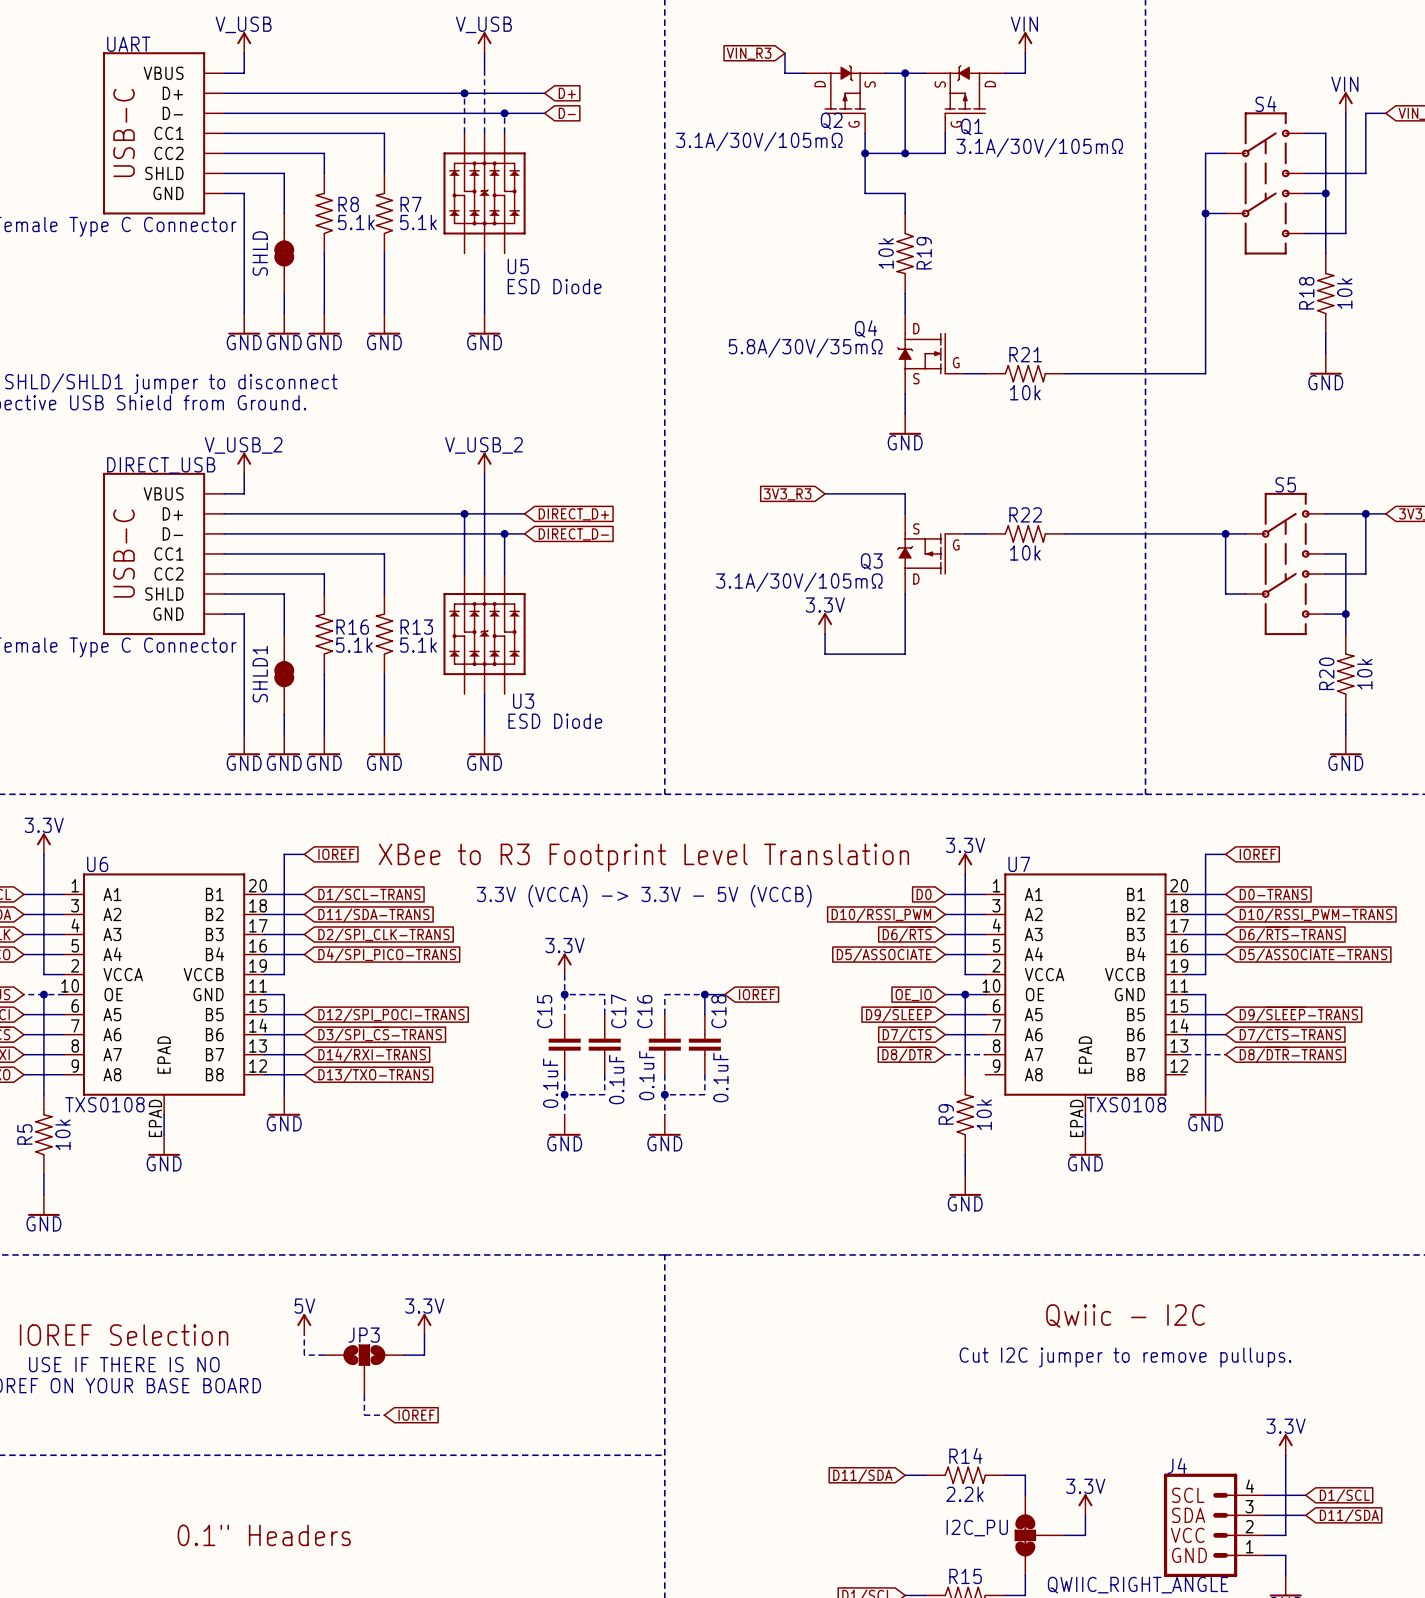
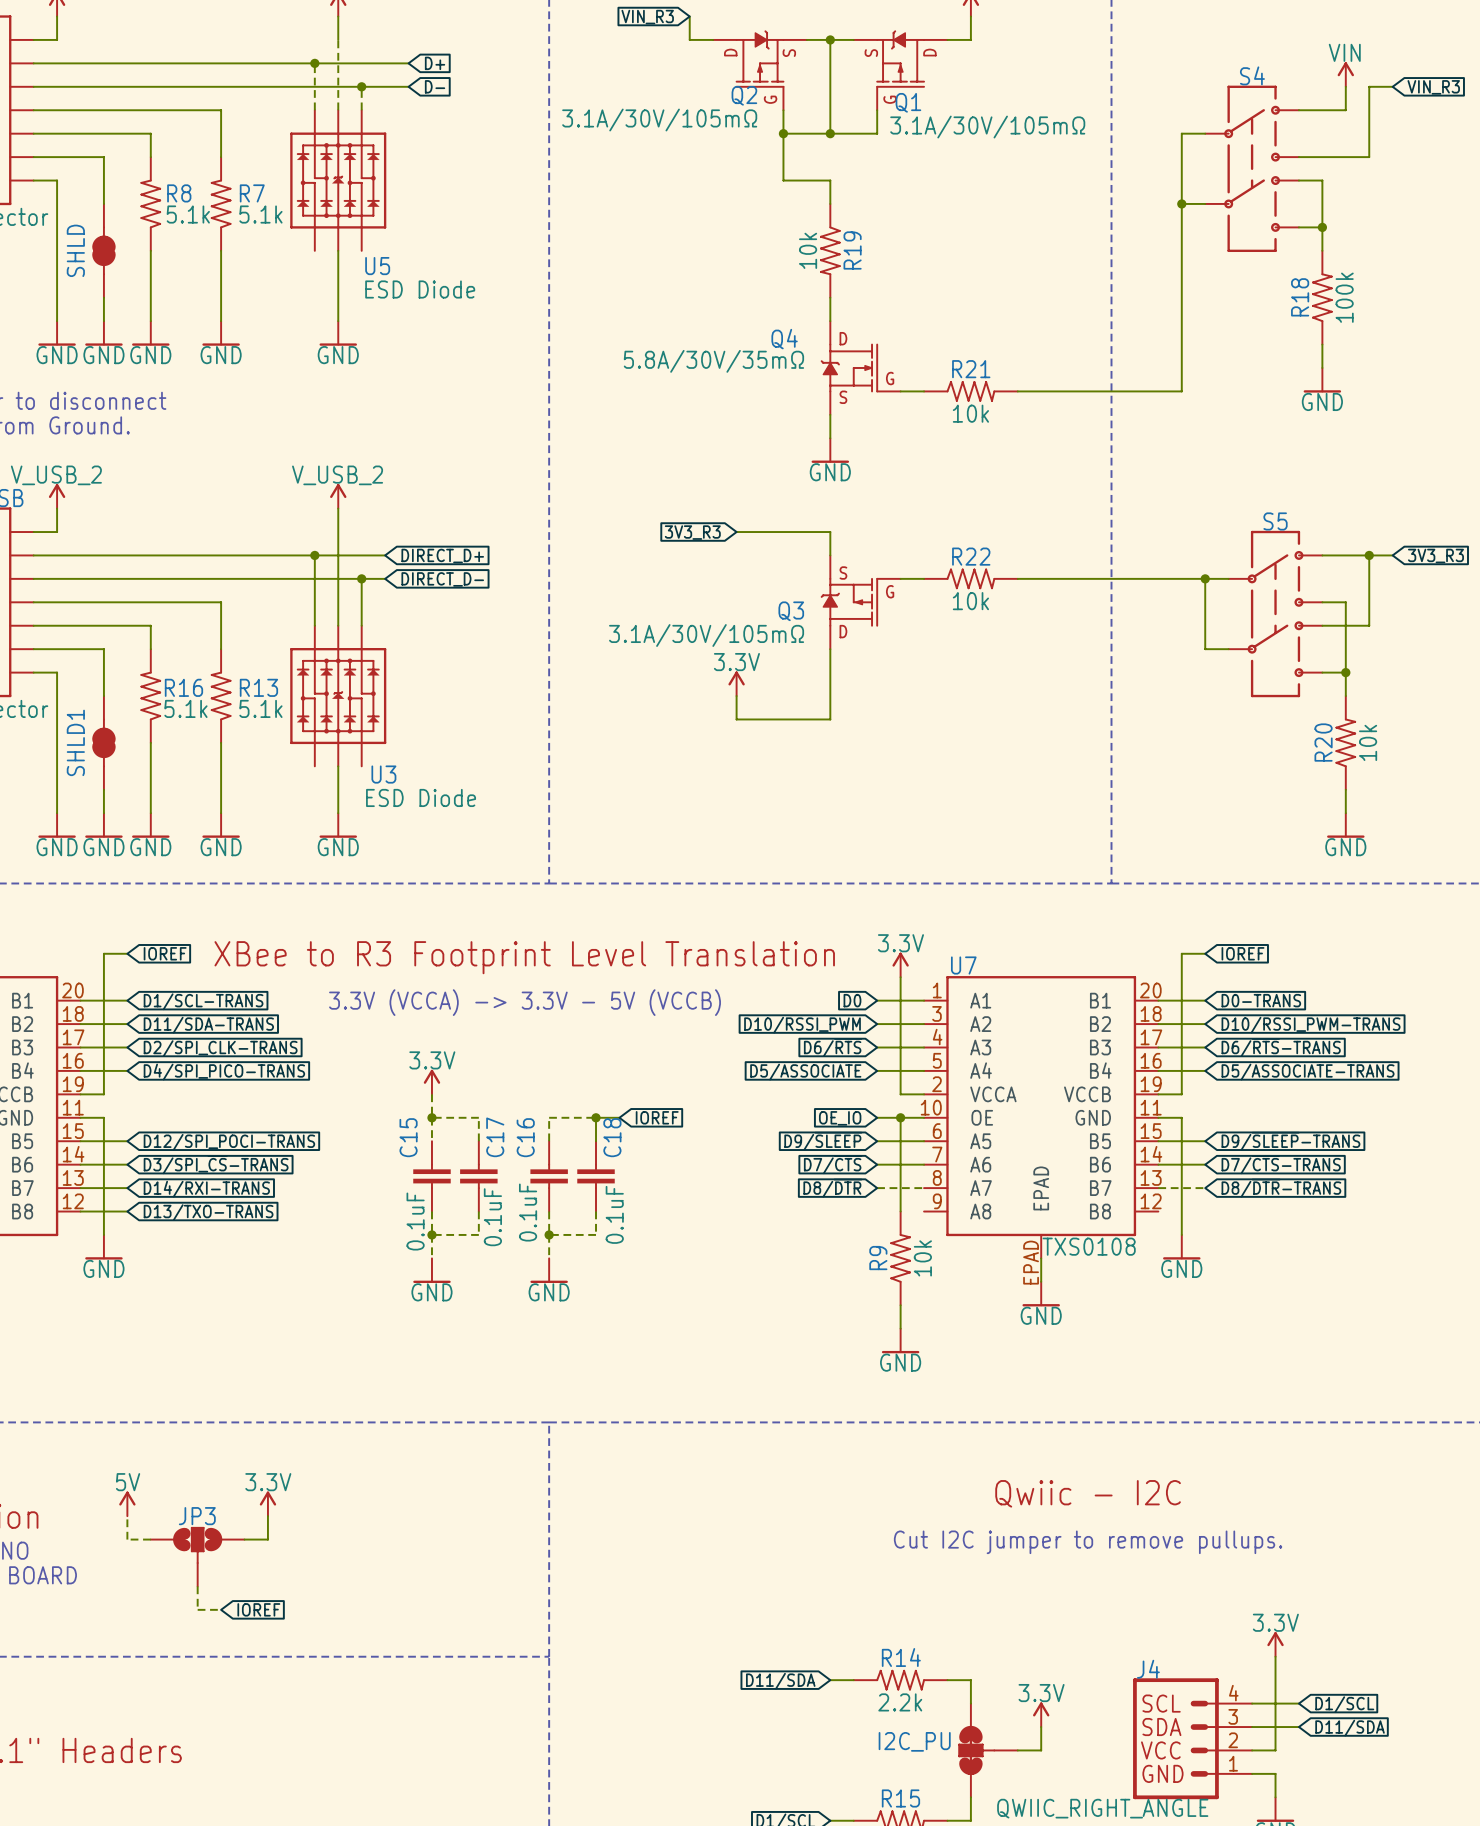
wire: (1325, 133) (1325, 193) -> (1322, 110) (1345, 110)
wire: (1345, 133) (1345, 233) (1325, 233) -> none
junction position: (1325, 193) -> (1322, 227)
R18 value: 10k (1344, 293) -> 100k (1344, 297)

